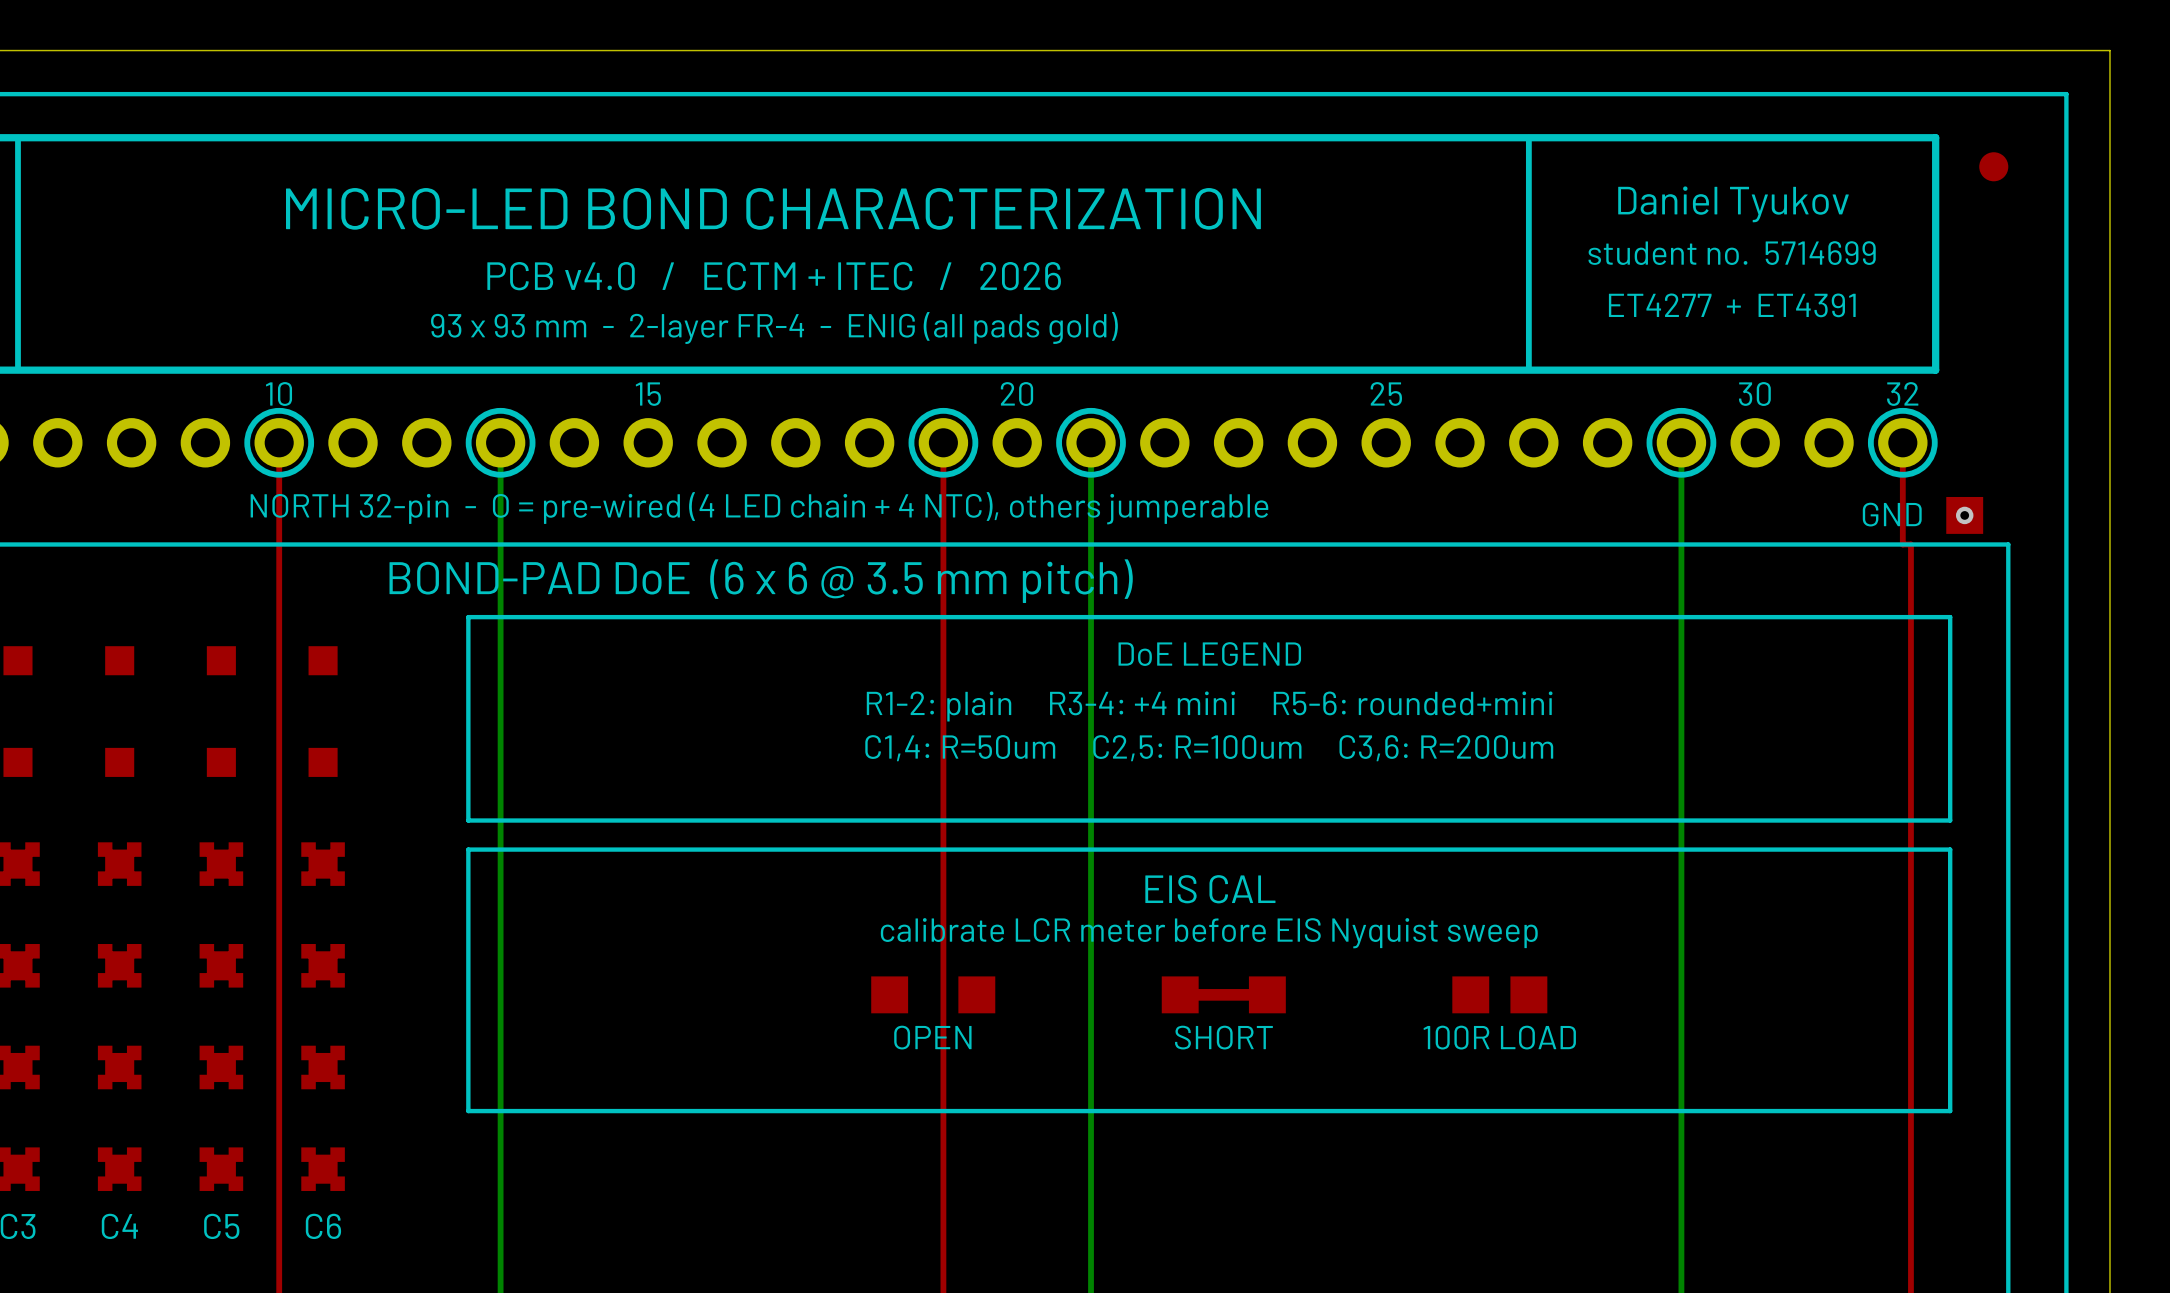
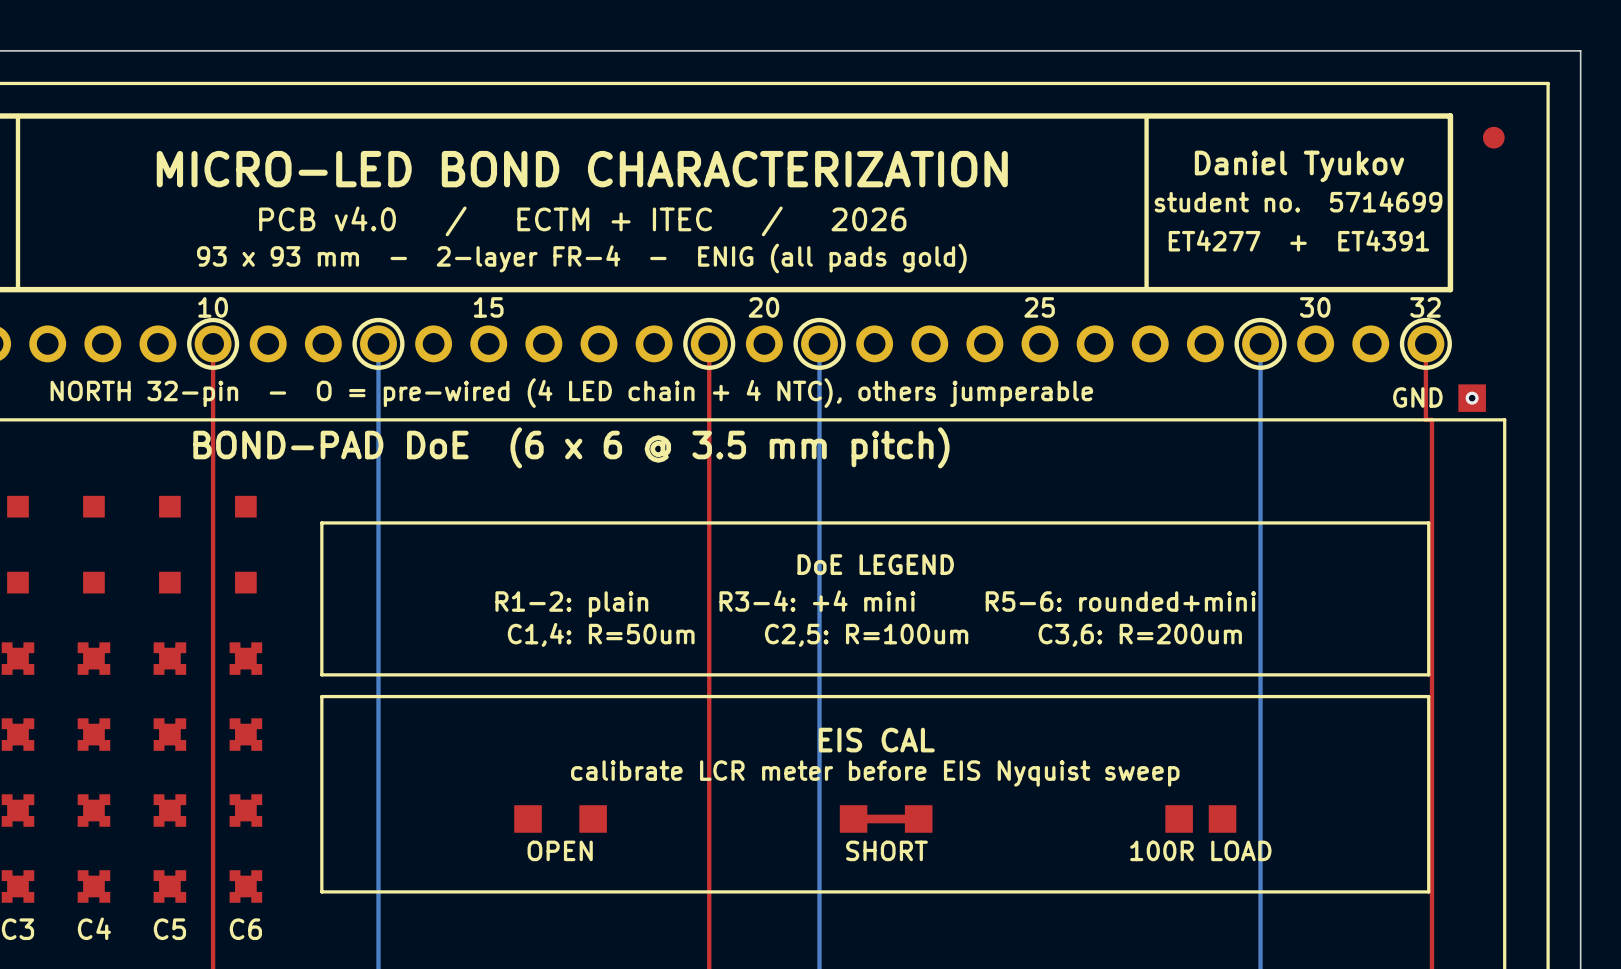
line: (468, 617) (1950, 617) (1950, 820) (468, 820) (468, 617) -> (321, 522) (1428, 522) (1428, 674) (321, 674) (321, 522)
text position: DoE LEGEND (1209, 654) -> DoE LEGEND (875, 564)
text position: R1-2: plain R3-4: +4 mini R5-6: rounded+mini (1209, 706) -> R1-2: plain R3-4: +4 mini R5-6: rounded+mini (875, 603)
text position: C1,4: R=50um C2,5: R=100um C3,6: R=200um (1209, 748) -> C1,4: R=50um C2,5: R=100um C3,6: R=200um (874, 634)
line: (468, 849) (468, 1111) (1950, 1111) (1950, 849) (468, 849) -> (321, 696) (321, 891) (1428, 891) (1428, 696) (321, 696)
text position: EIS CAL (1210, 889) -> EIS CAL (876, 740)
text position: calibrate LCR meter before EIS Nyquist sweep (1209, 933) -> calibrate LCR meter before EIS Nyquist sweep (875, 773)
part: (889, 994) -> none
part: (976, 994) -> none
top track: (1180, 994) (1267, 994) -> (853, 818) (918, 818)
part: (1180, 994) -> none
part: (1267, 994) -> none
part position: (1499, 994) -> (1200, 818)
text position: OPEN (932, 1037) -> OPEN (560, 850)
text position: SHORT (1223, 1037) -> SHORT (886, 850)
text position: 100R LOAD (1499, 1037) -> 100R LOAD (1200, 850)
part: none -> (528, 818)
part: none -> (593, 818)
part: none -> (853, 818)
part: none -> (918, 818)

